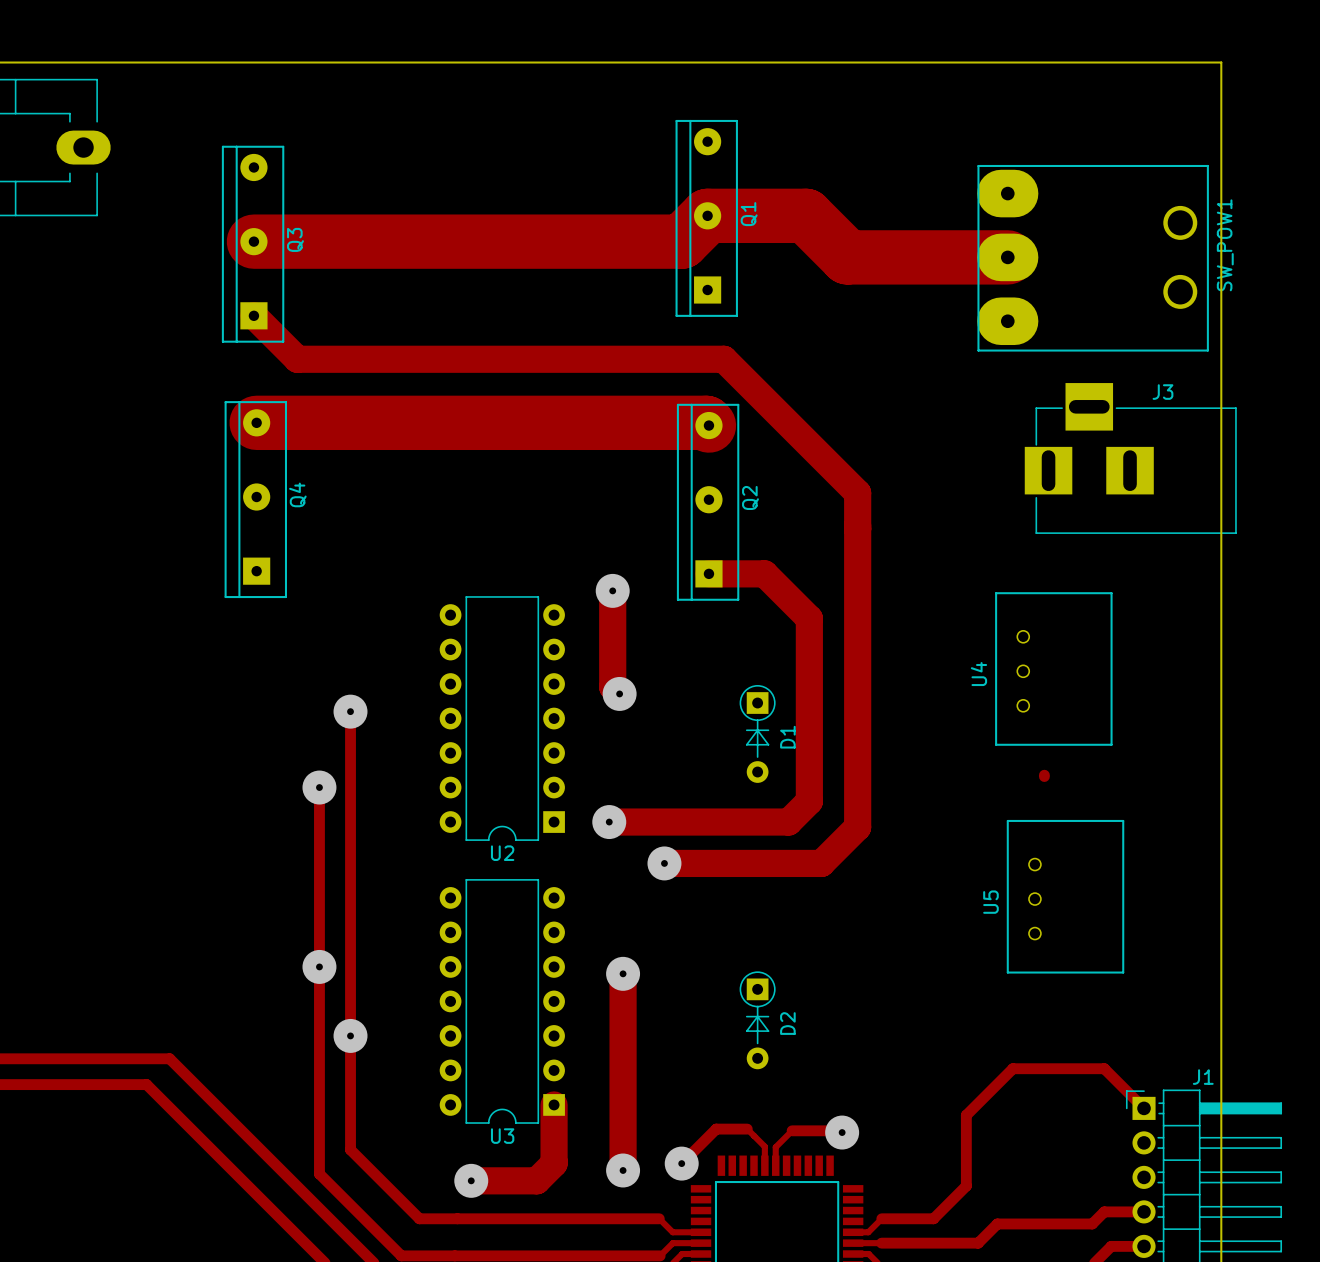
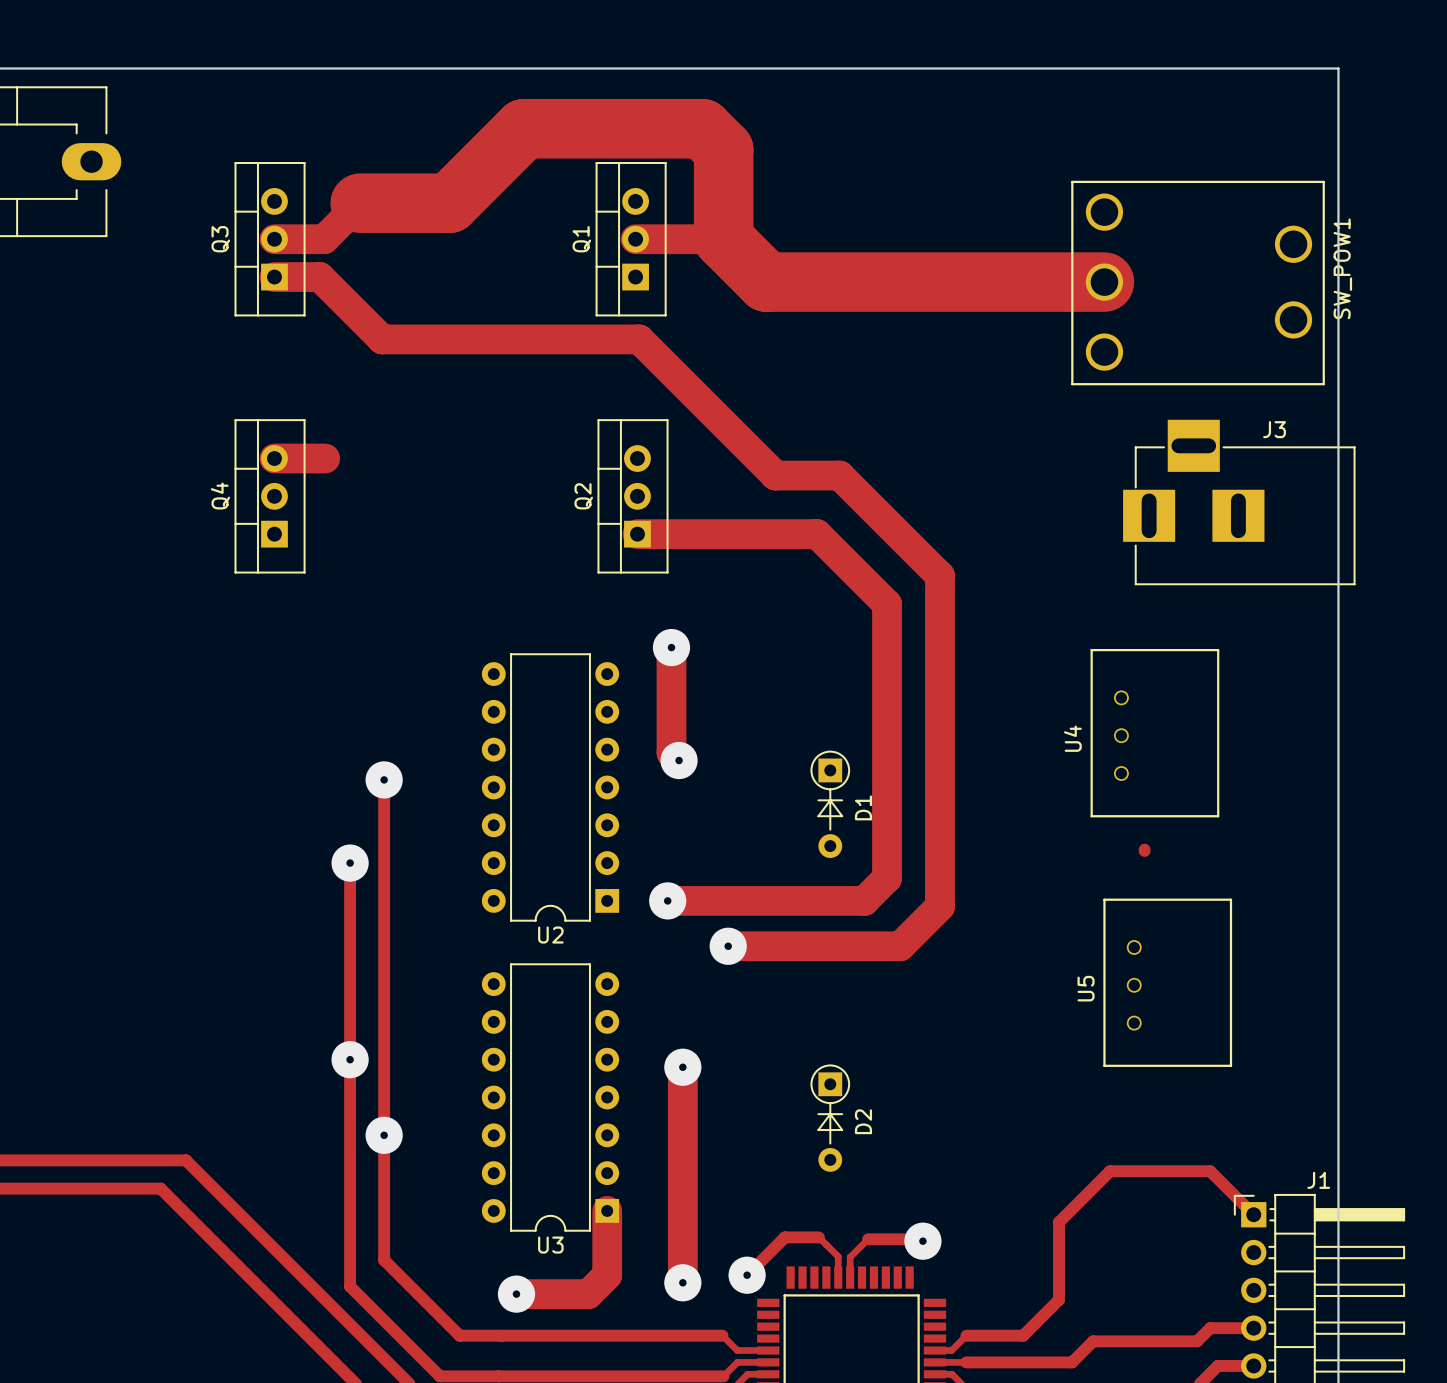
Q1 footprint: [675, 119, 738, 317] -> [595, 162, 667, 317]
Q3 footprint: [221, 145, 285, 343] -> [234, 162, 306, 317]
SW_POW1 footprint: [977, 164, 1209, 352] -> [1071, 180, 1325, 386]
Q1 name position: Q1 (749, 214) -> Q1 (581, 239)
track: none -> (274, 239) (324, 239) (360, 203) (449, 203) (523, 128) (702, 128) (723, 149) (723, 239)
track: none -> (635, 239) (723, 239)
Q3 name position: Q3 (295, 239) -> Q3 (220, 239)
track: (253, 241) (681, 241) (707, 215) (805, 215) (847, 257) -> (723, 239) (766, 282) (928, 282)
track: (253, 315) (297, 359) (723, 359) (857, 493) (857, 525) -> (274, 277) (319, 277) (382, 339) (639, 339) (775, 475) (839, 475) (939, 575)
Q4 footprint: [224, 401, 288, 599] -> [234, 419, 306, 574]
Q2 footprint: [676, 403, 740, 601] -> [597, 419, 669, 574]
track: none -> (274, 458) (325, 458)
track: (256, 422) (706, 422) (708, 425) -> none
Q4 name position: Q4 (297, 494) -> Q4 (220, 495)
Q2 name position: Q2 (750, 497) -> Q2 (583, 496)
track: (708, 573) (764, 573) (809, 618) -> (637, 534) (817, 534) (887, 604) (887, 677)

